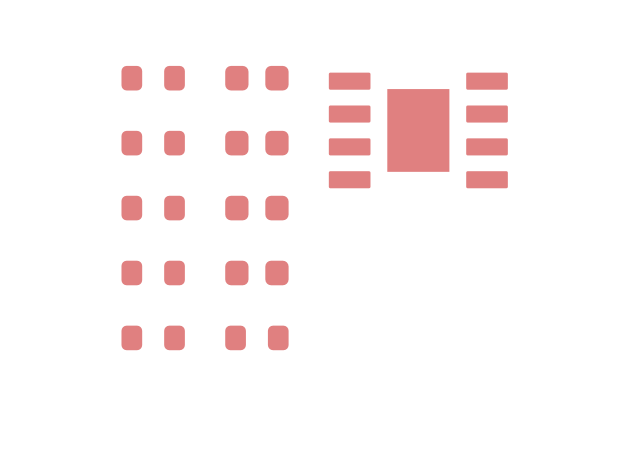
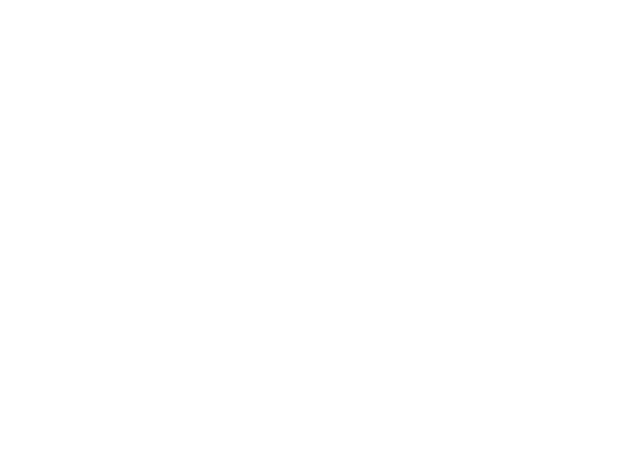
part: (153, 78) -> none
part: (256, 78) -> none
part: (418, 130) -> none
part: (153, 143) -> none
part: (256, 143) -> none
part: (153, 208) -> none
part: (256, 208) -> none
part: (153, 272) -> none
part: (256, 272) -> none
part: (153, 337) -> none
part: (256, 337) -> none

